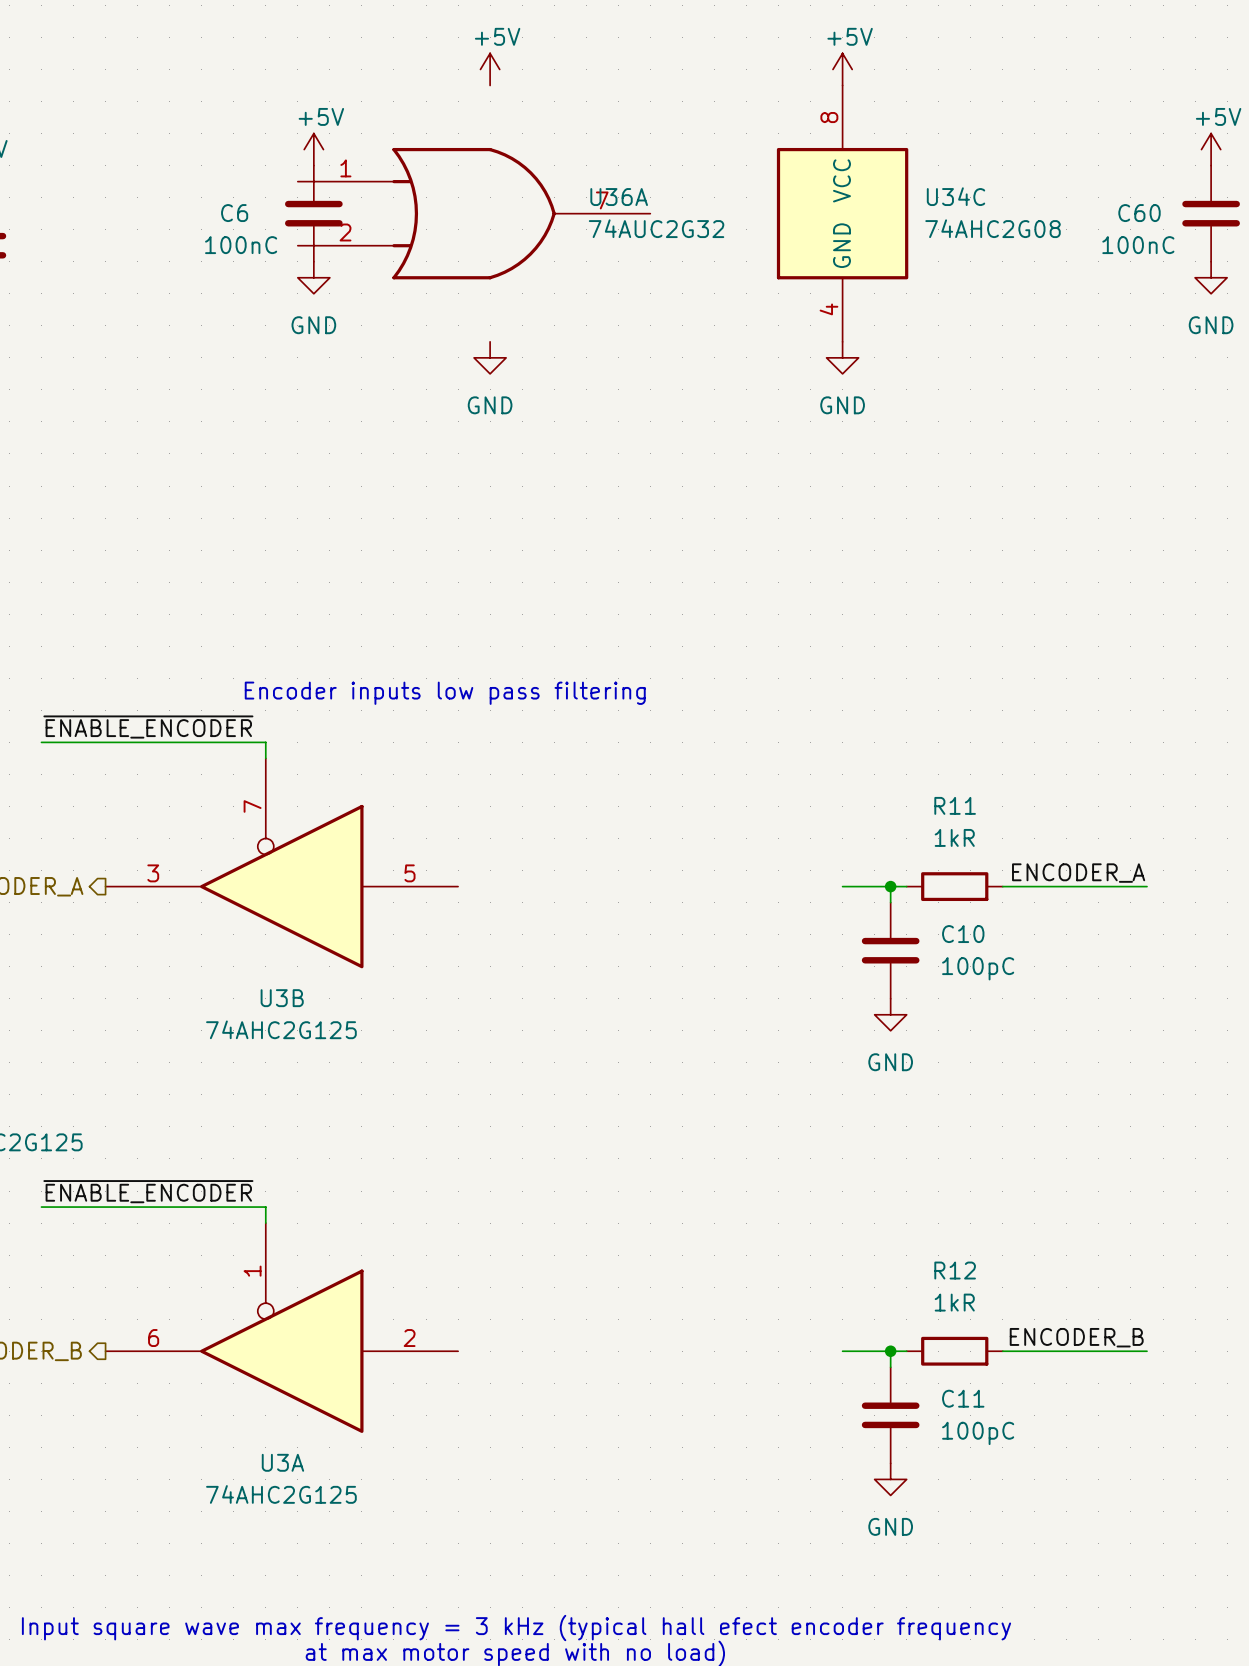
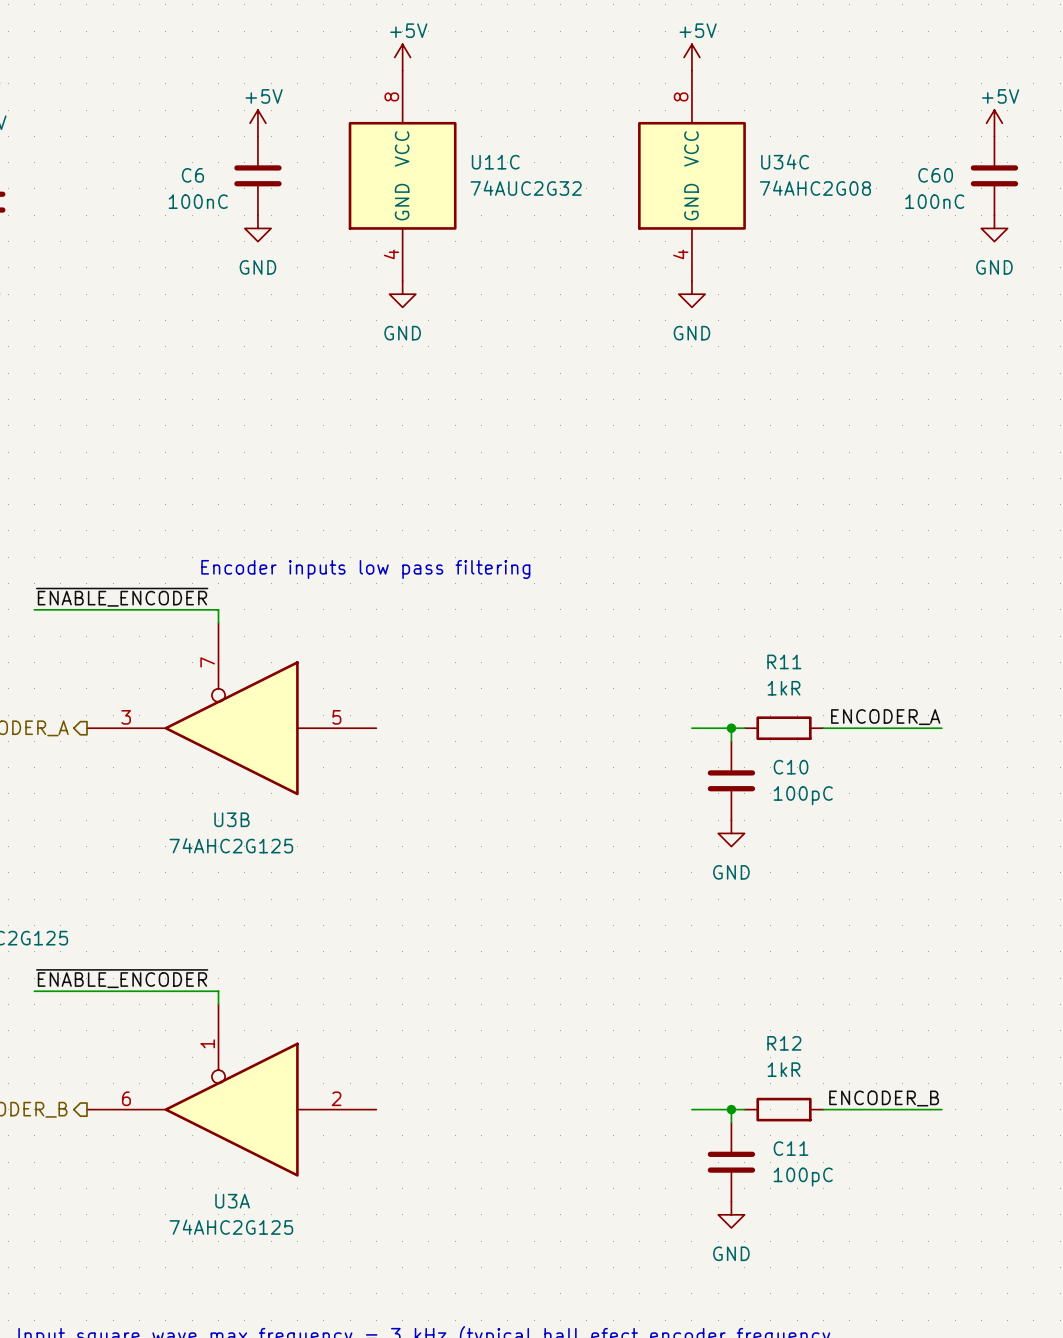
U36A: 74AUC2G32 (474, 213) -> none
U11C: none -> 74AUC2G32 (402, 175)

